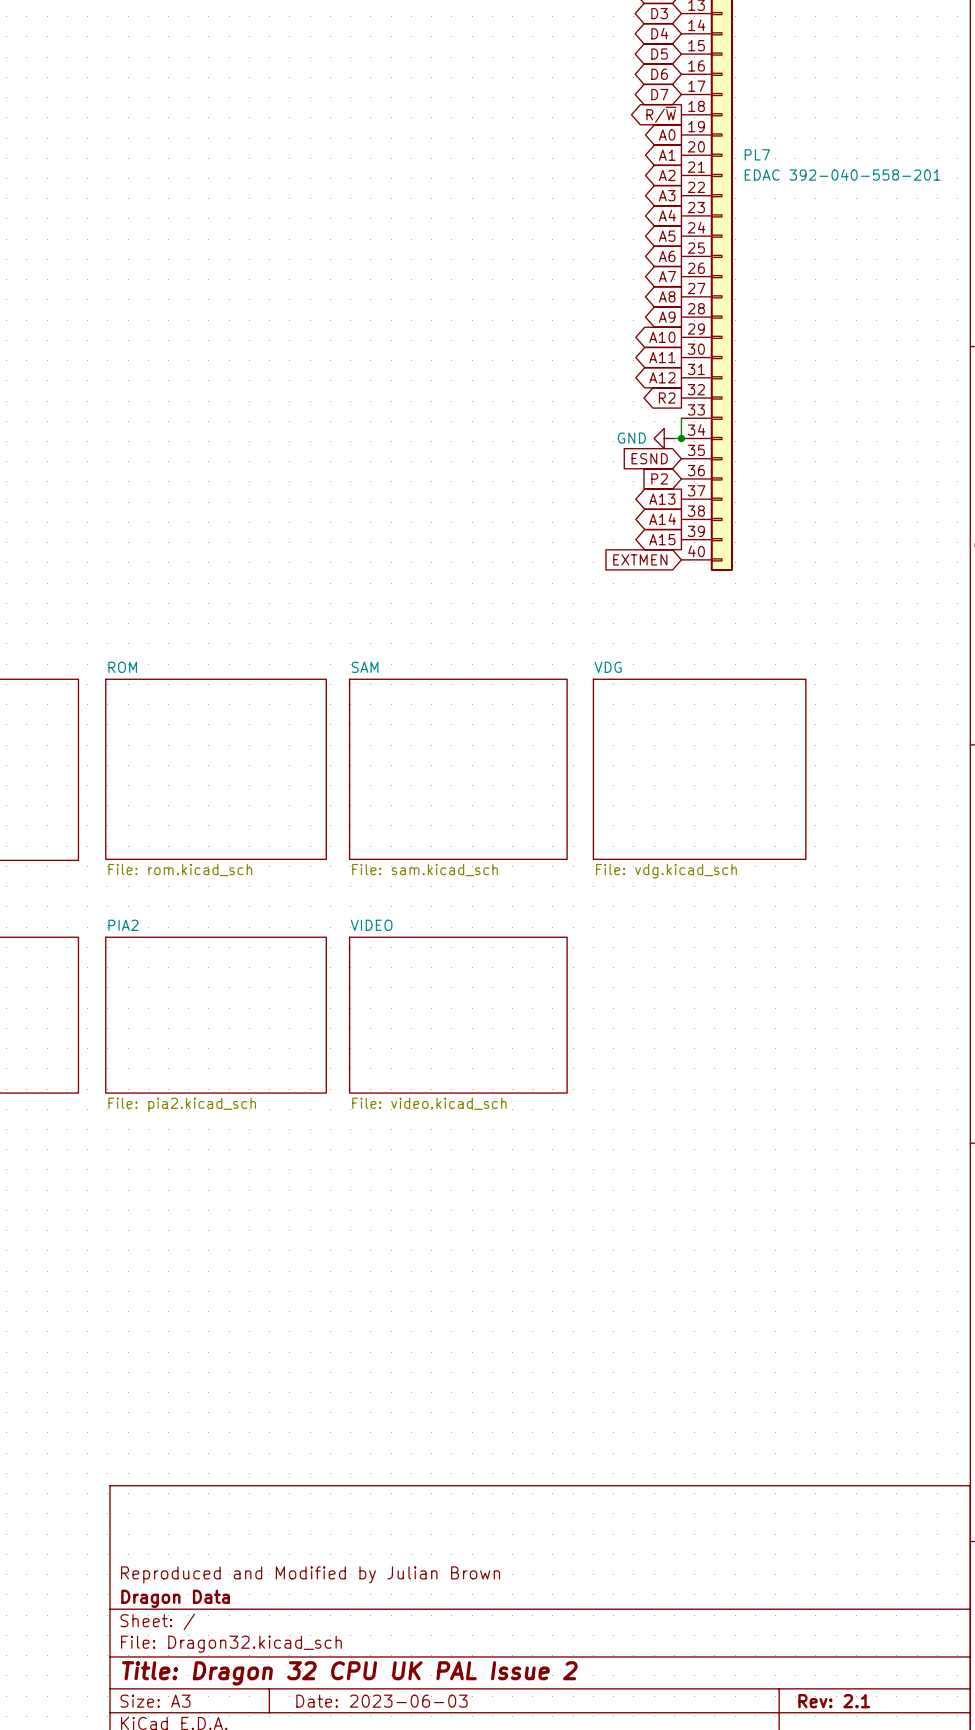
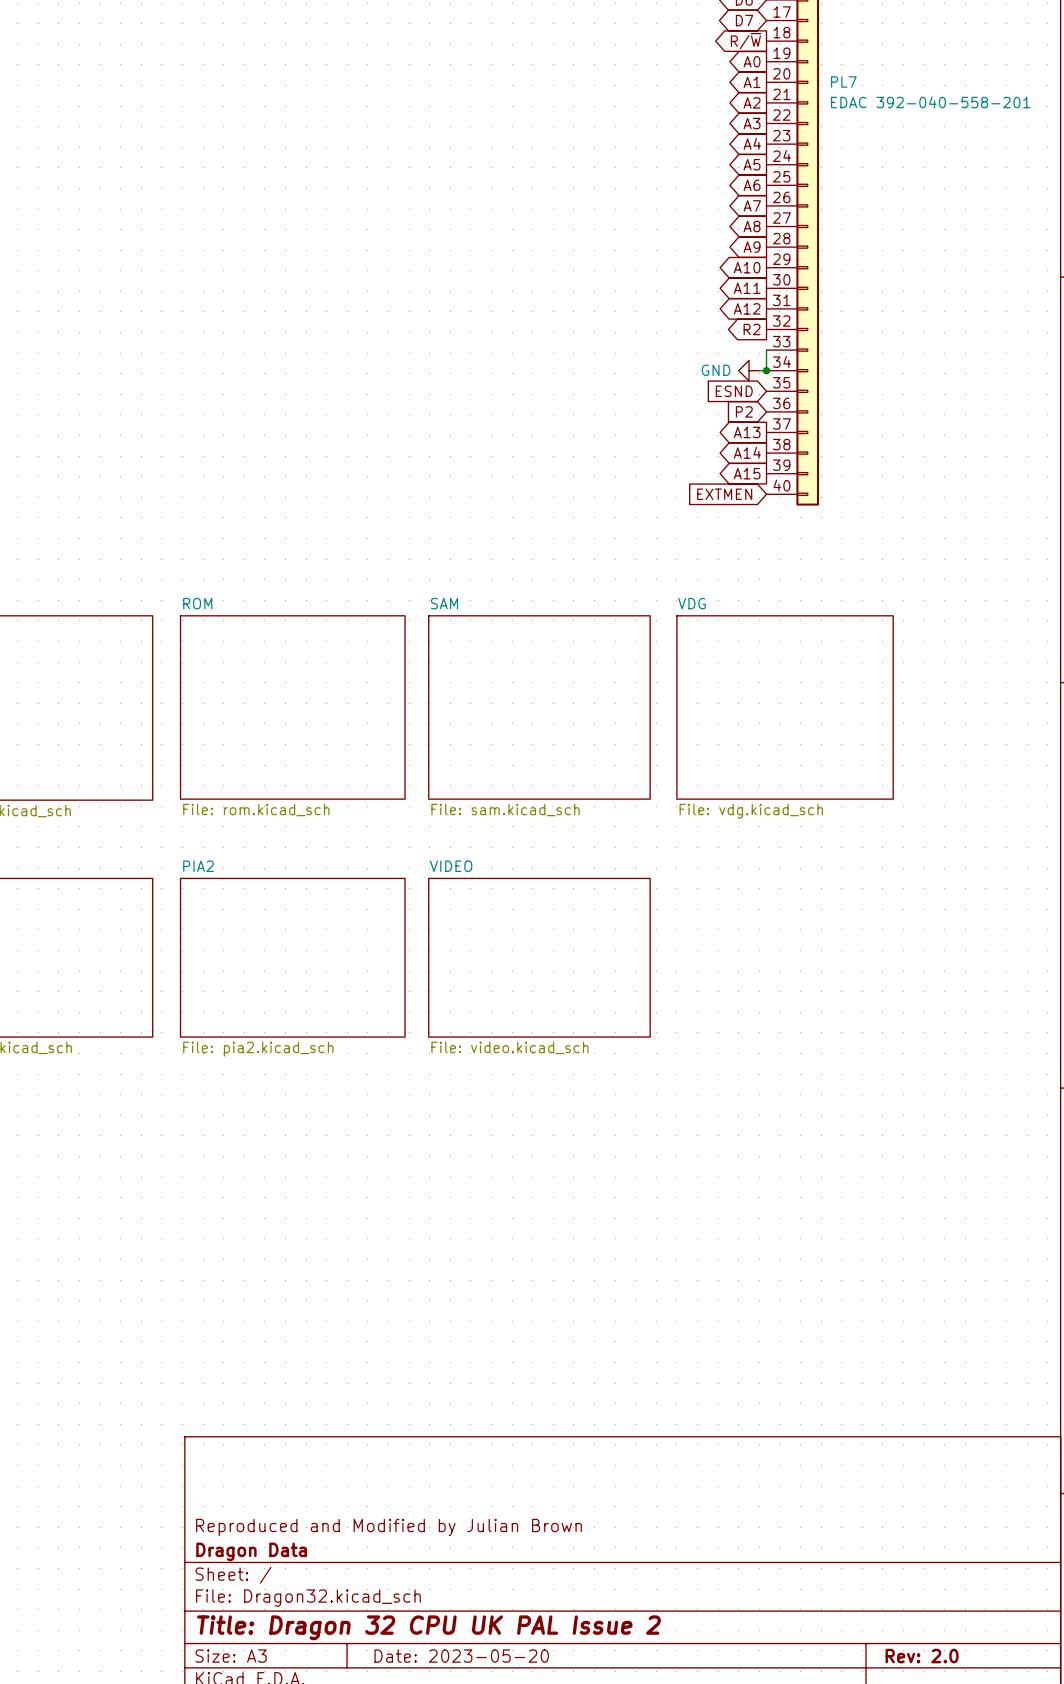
title block: Date: 2023-06-03 (381, 1701) -> Date: 2023-05-20 (461, 1656)
title block: Rev: 2.1 (834, 1701) -> Rev: 2.0 (922, 1656)

